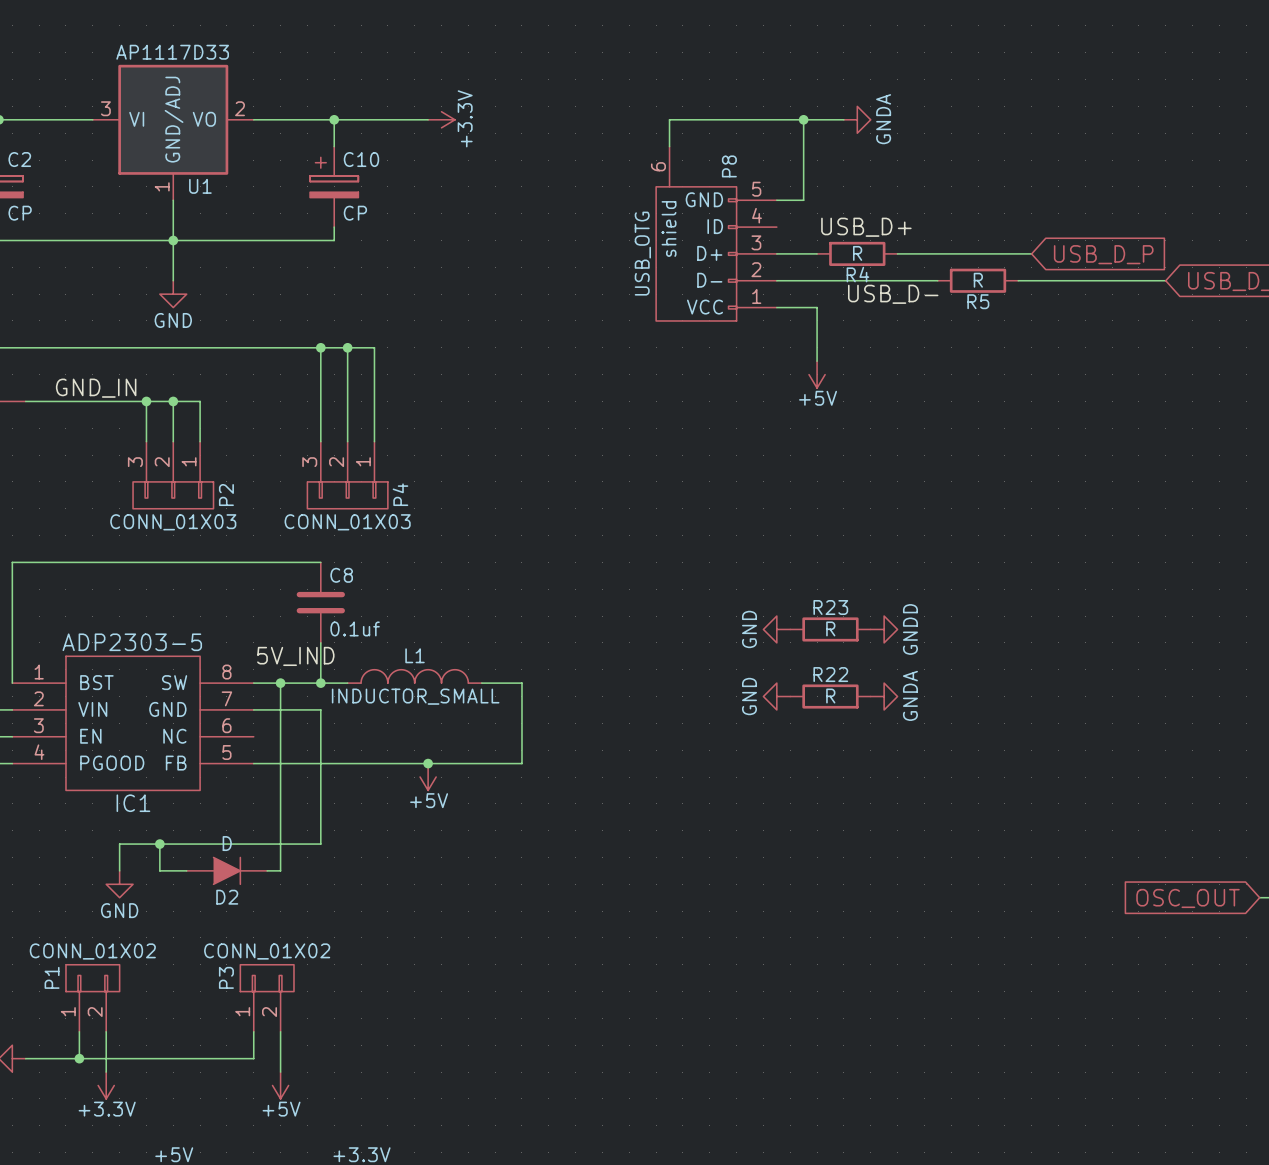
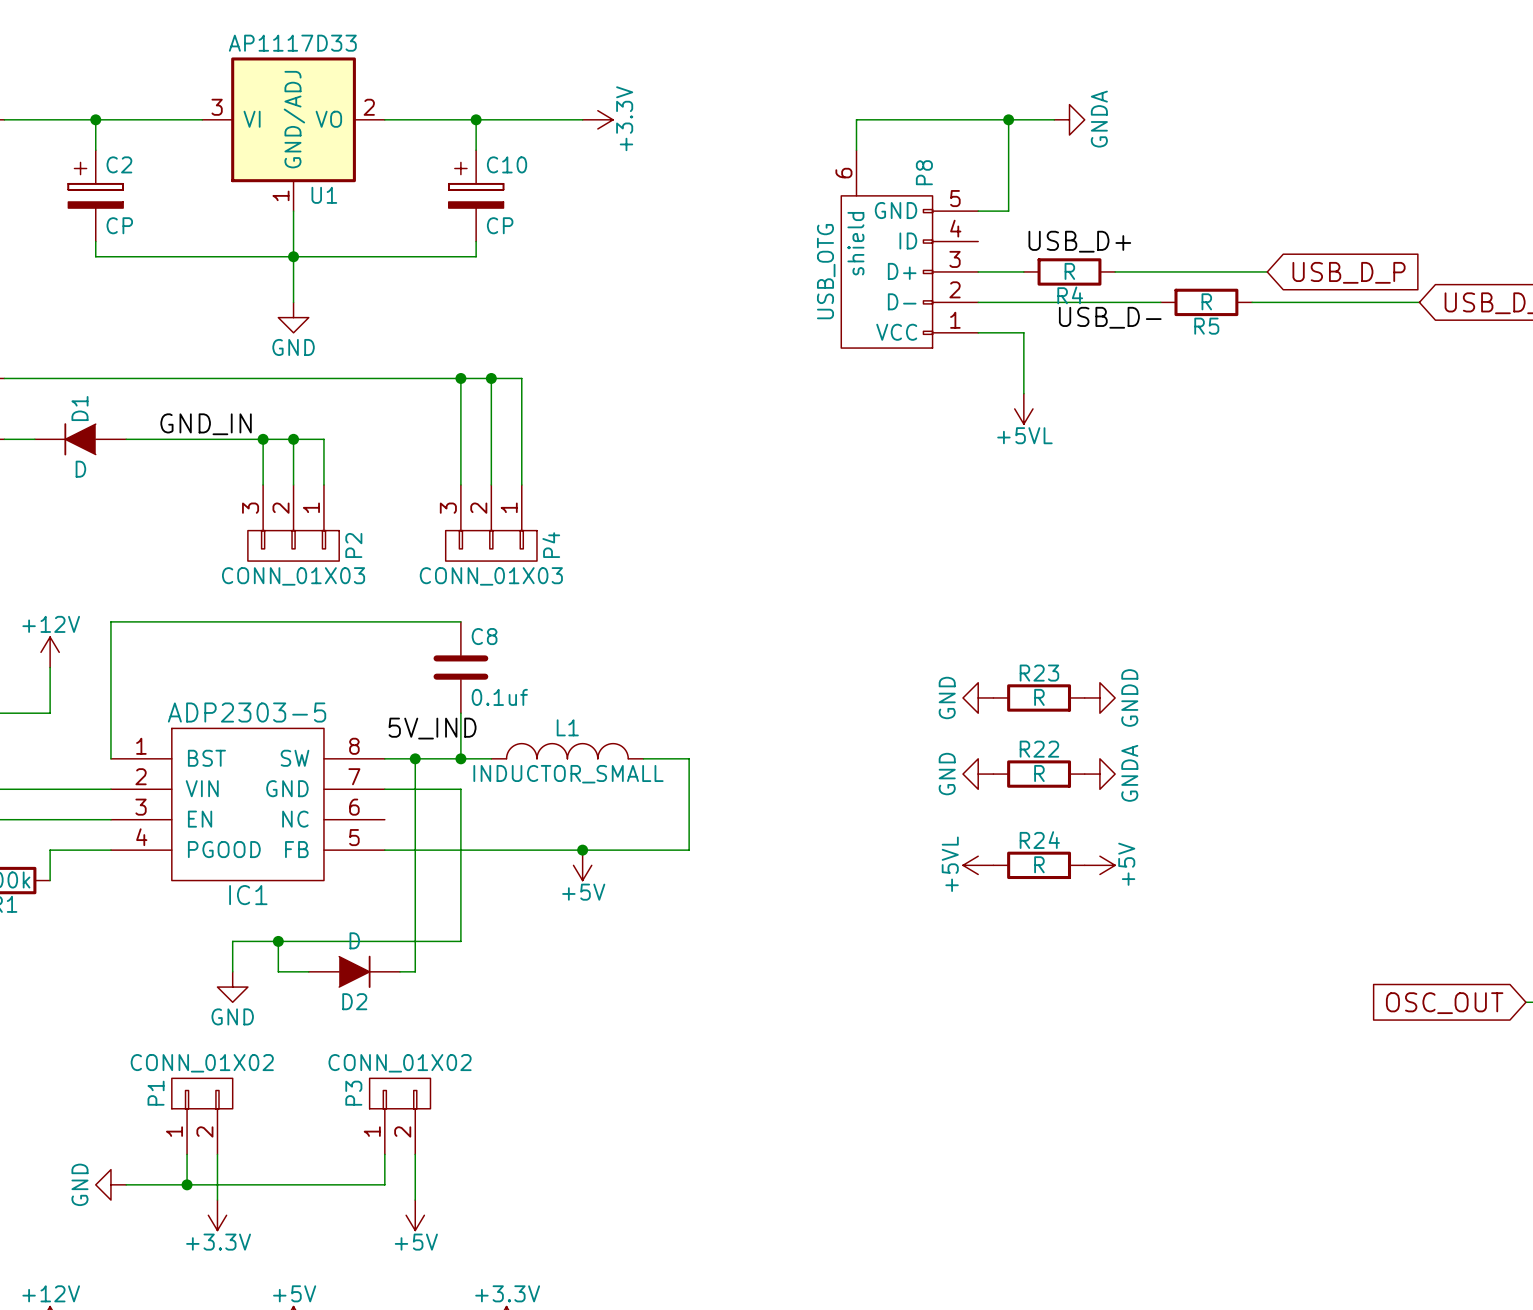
power symbol: +5V (817, 374) -> +5VL (1023, 408)
power symbol: none -> +5VL (978, 865)
R24: none -> R (1039, 865)
power symbol: none -> +5V (1099, 865)

